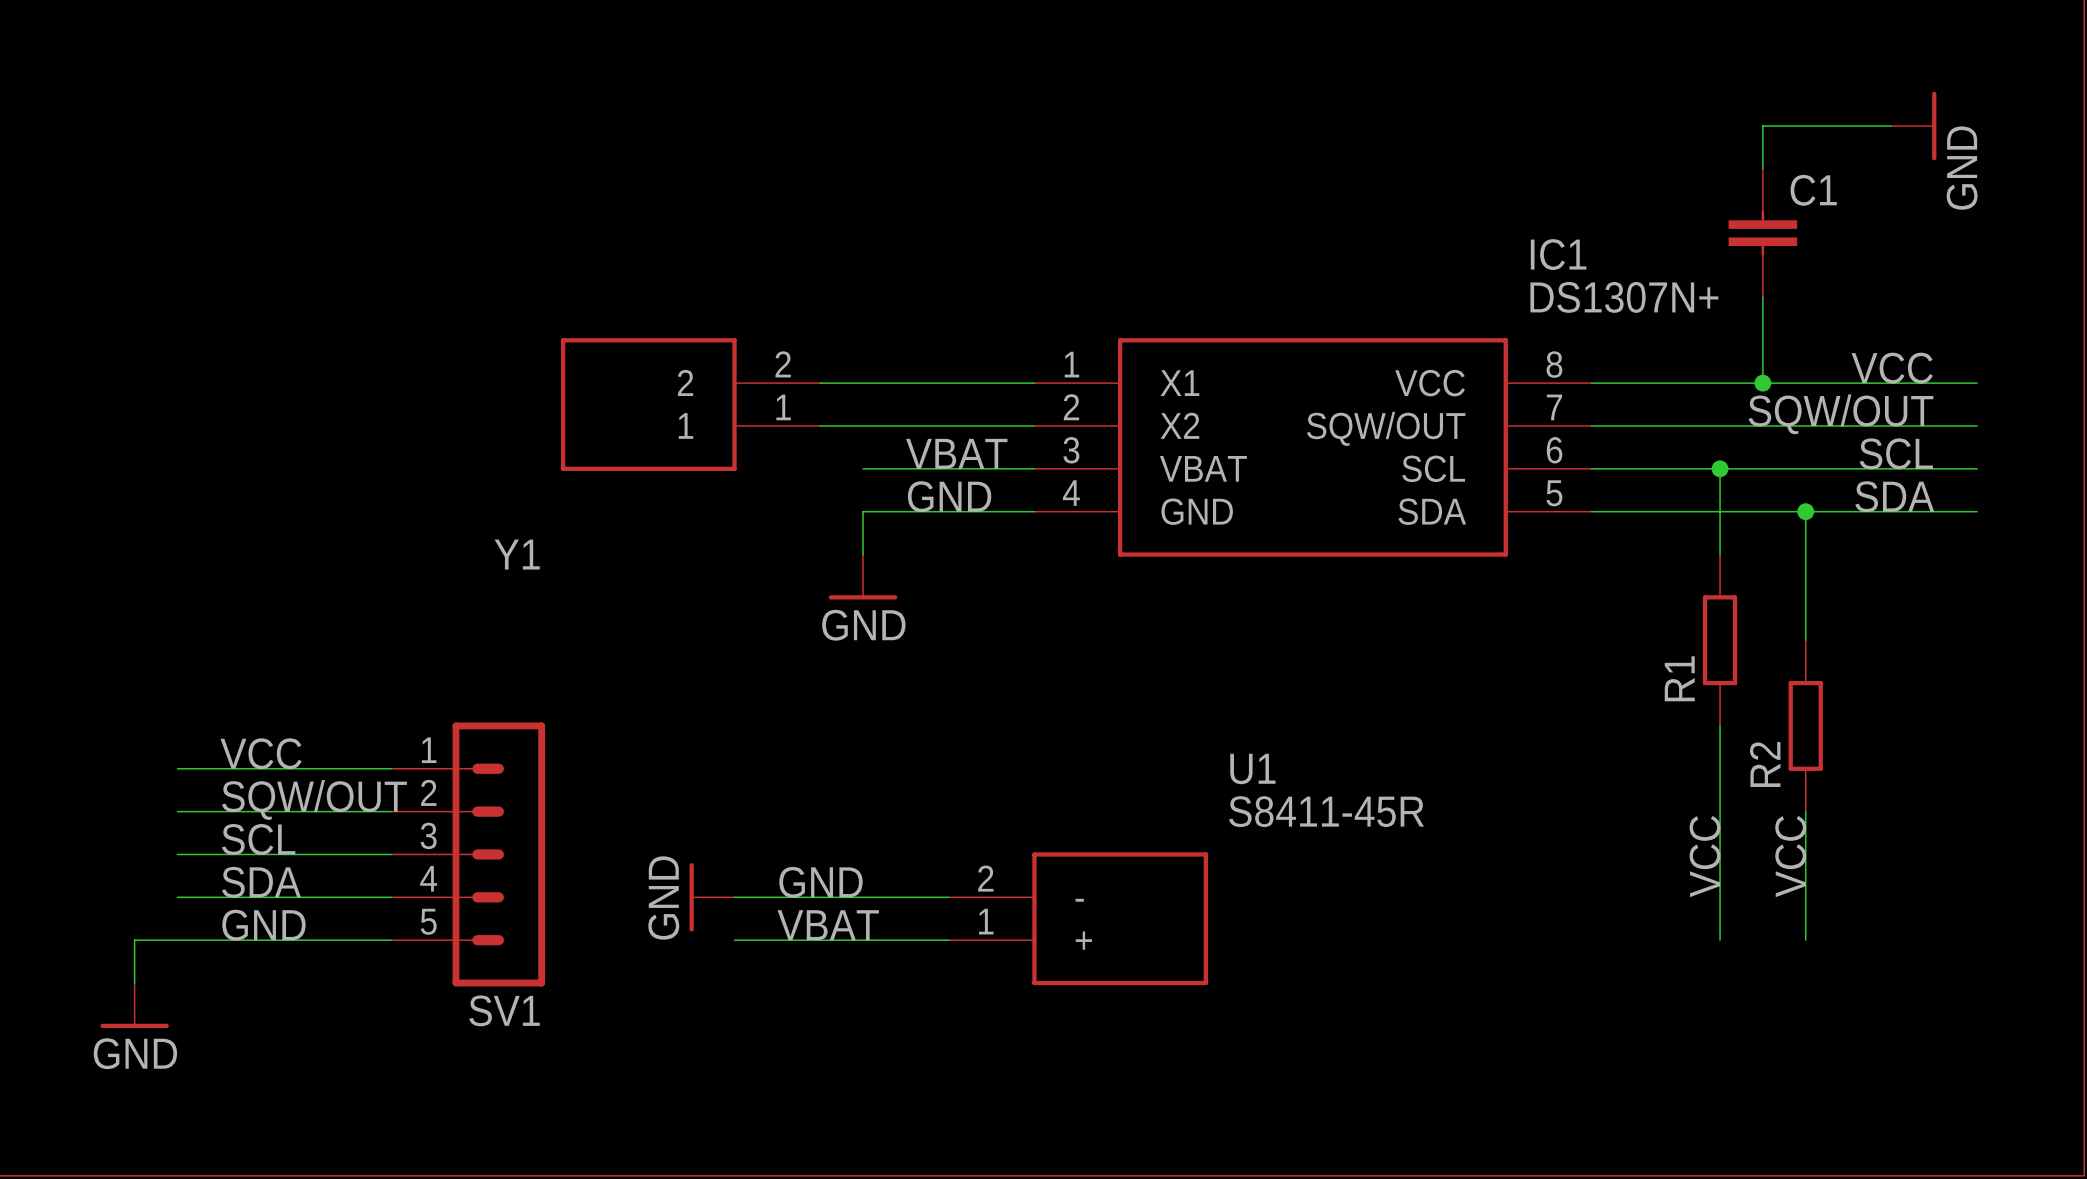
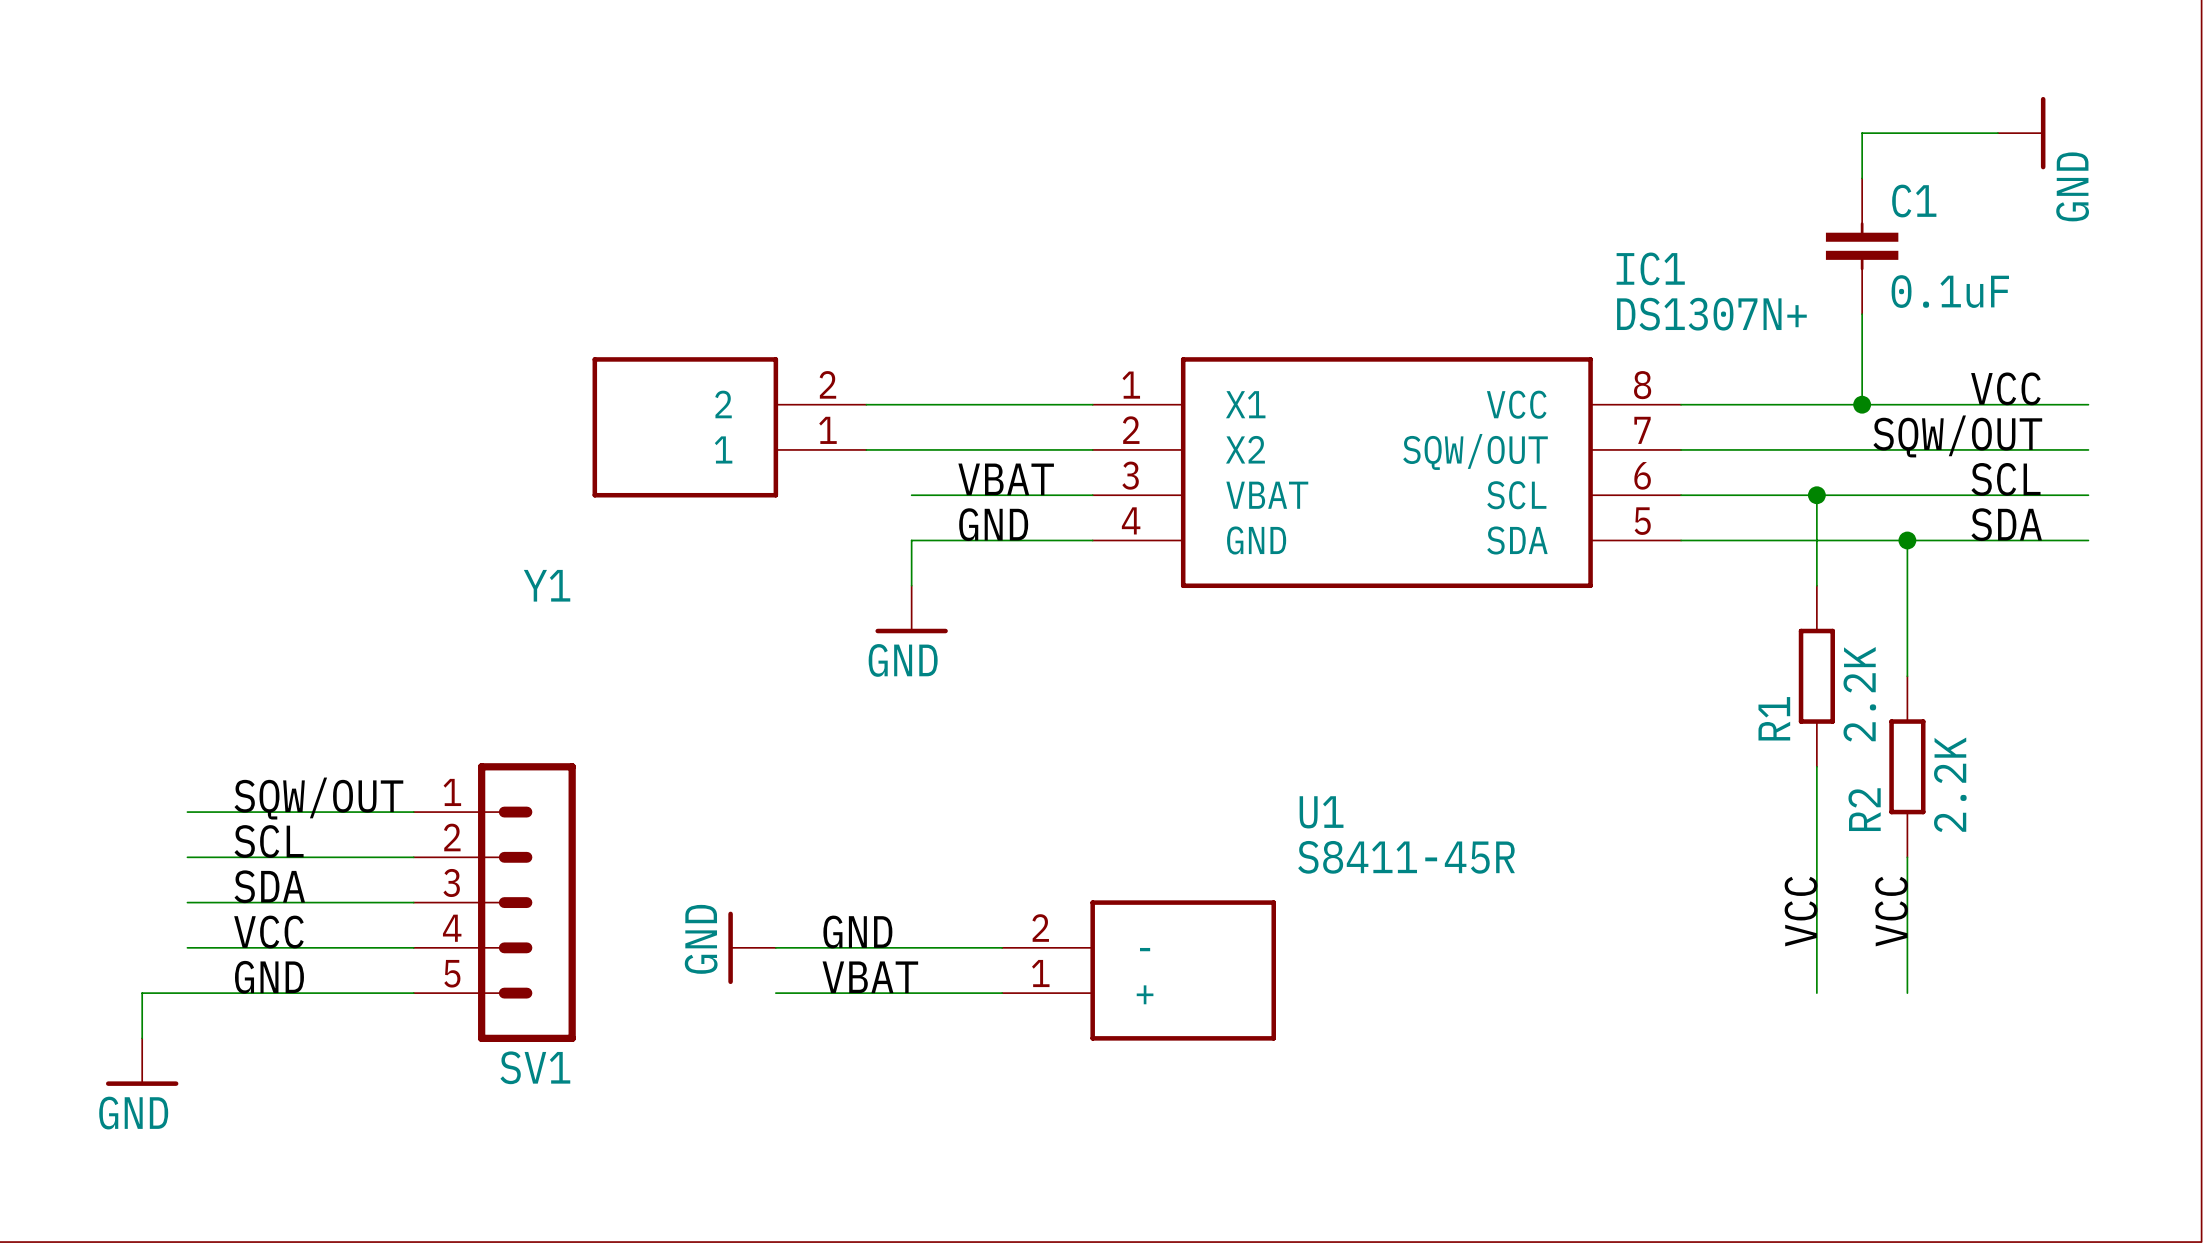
C1 value: none -> 0.1uF (1950, 291)
R1 value: none -> 2.2K (1859, 694)
R2 value: none -> 2.2K (1950, 784)
label: VCC (261, 753) -> SQW/OUT (318, 798)
label: SQW/OUT (314, 799) -> SCL (269, 841)
label: SCL (258, 839) -> SDA (269, 886)
label: SDA (261, 882) -> VCC (268, 932)

